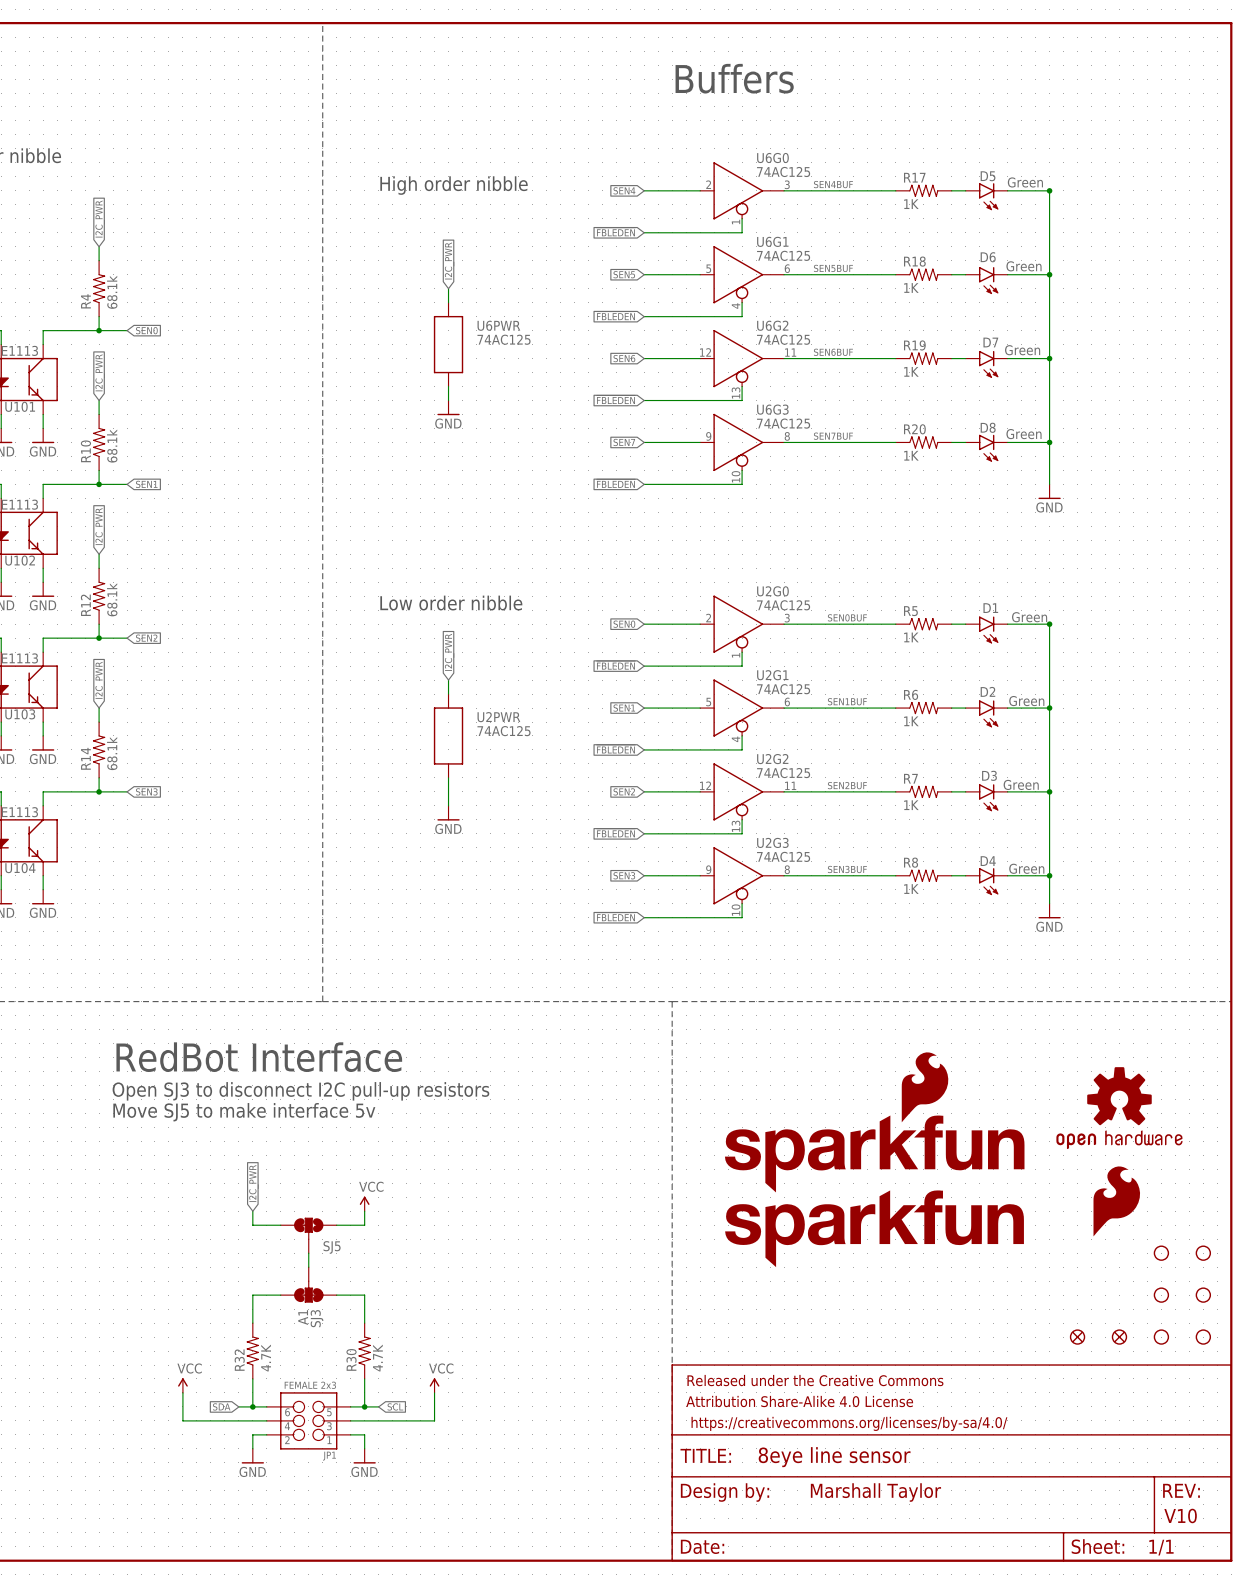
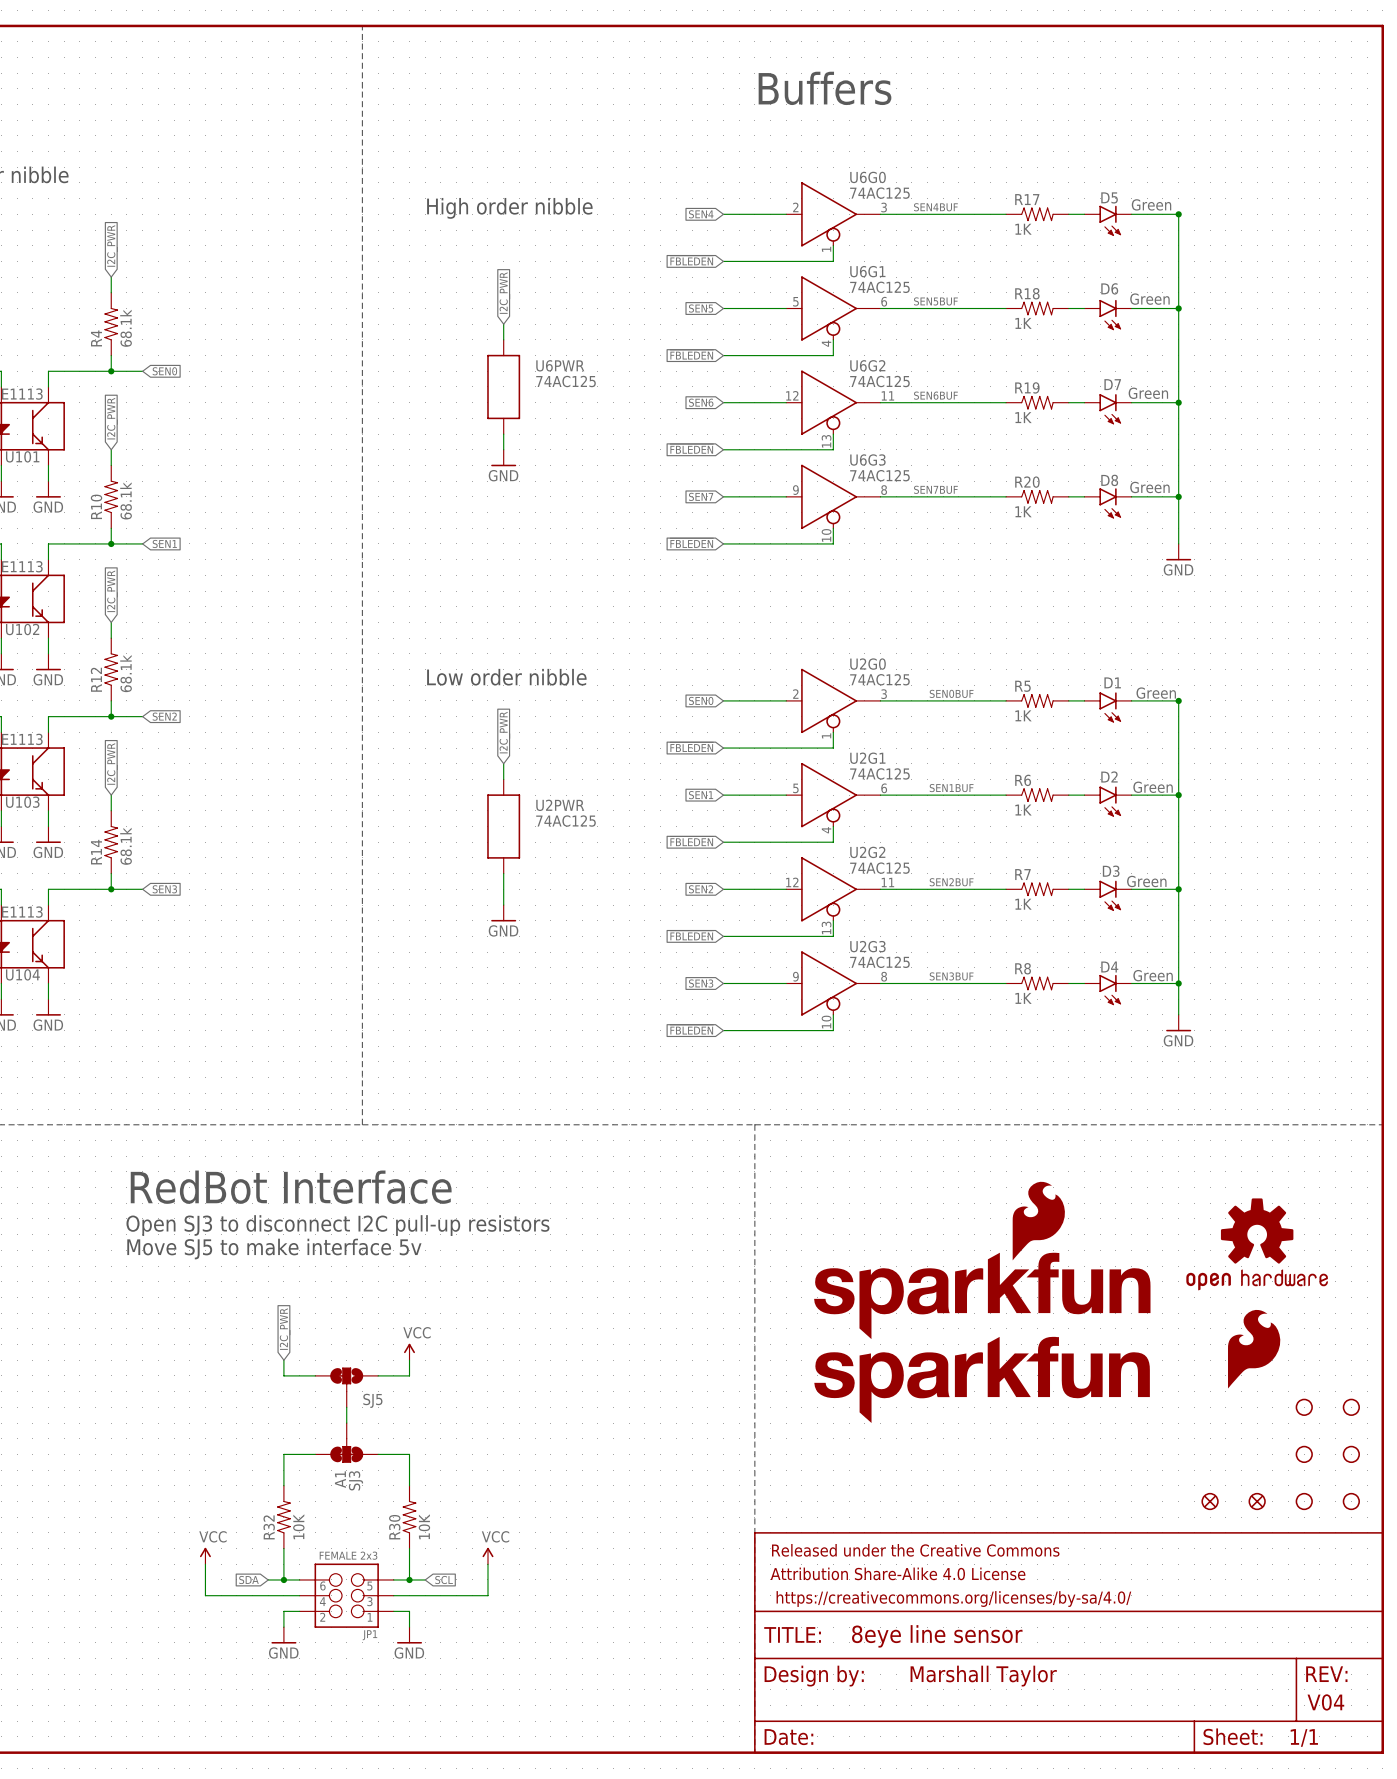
R32 value: 4.7K (266, 1358) -> 10K (298, 1526)
R30 value: 4.7K (377, 1358) -> 10K (424, 1526)
text: V10 (1180, 1515) -> V04 (1325, 1702)

